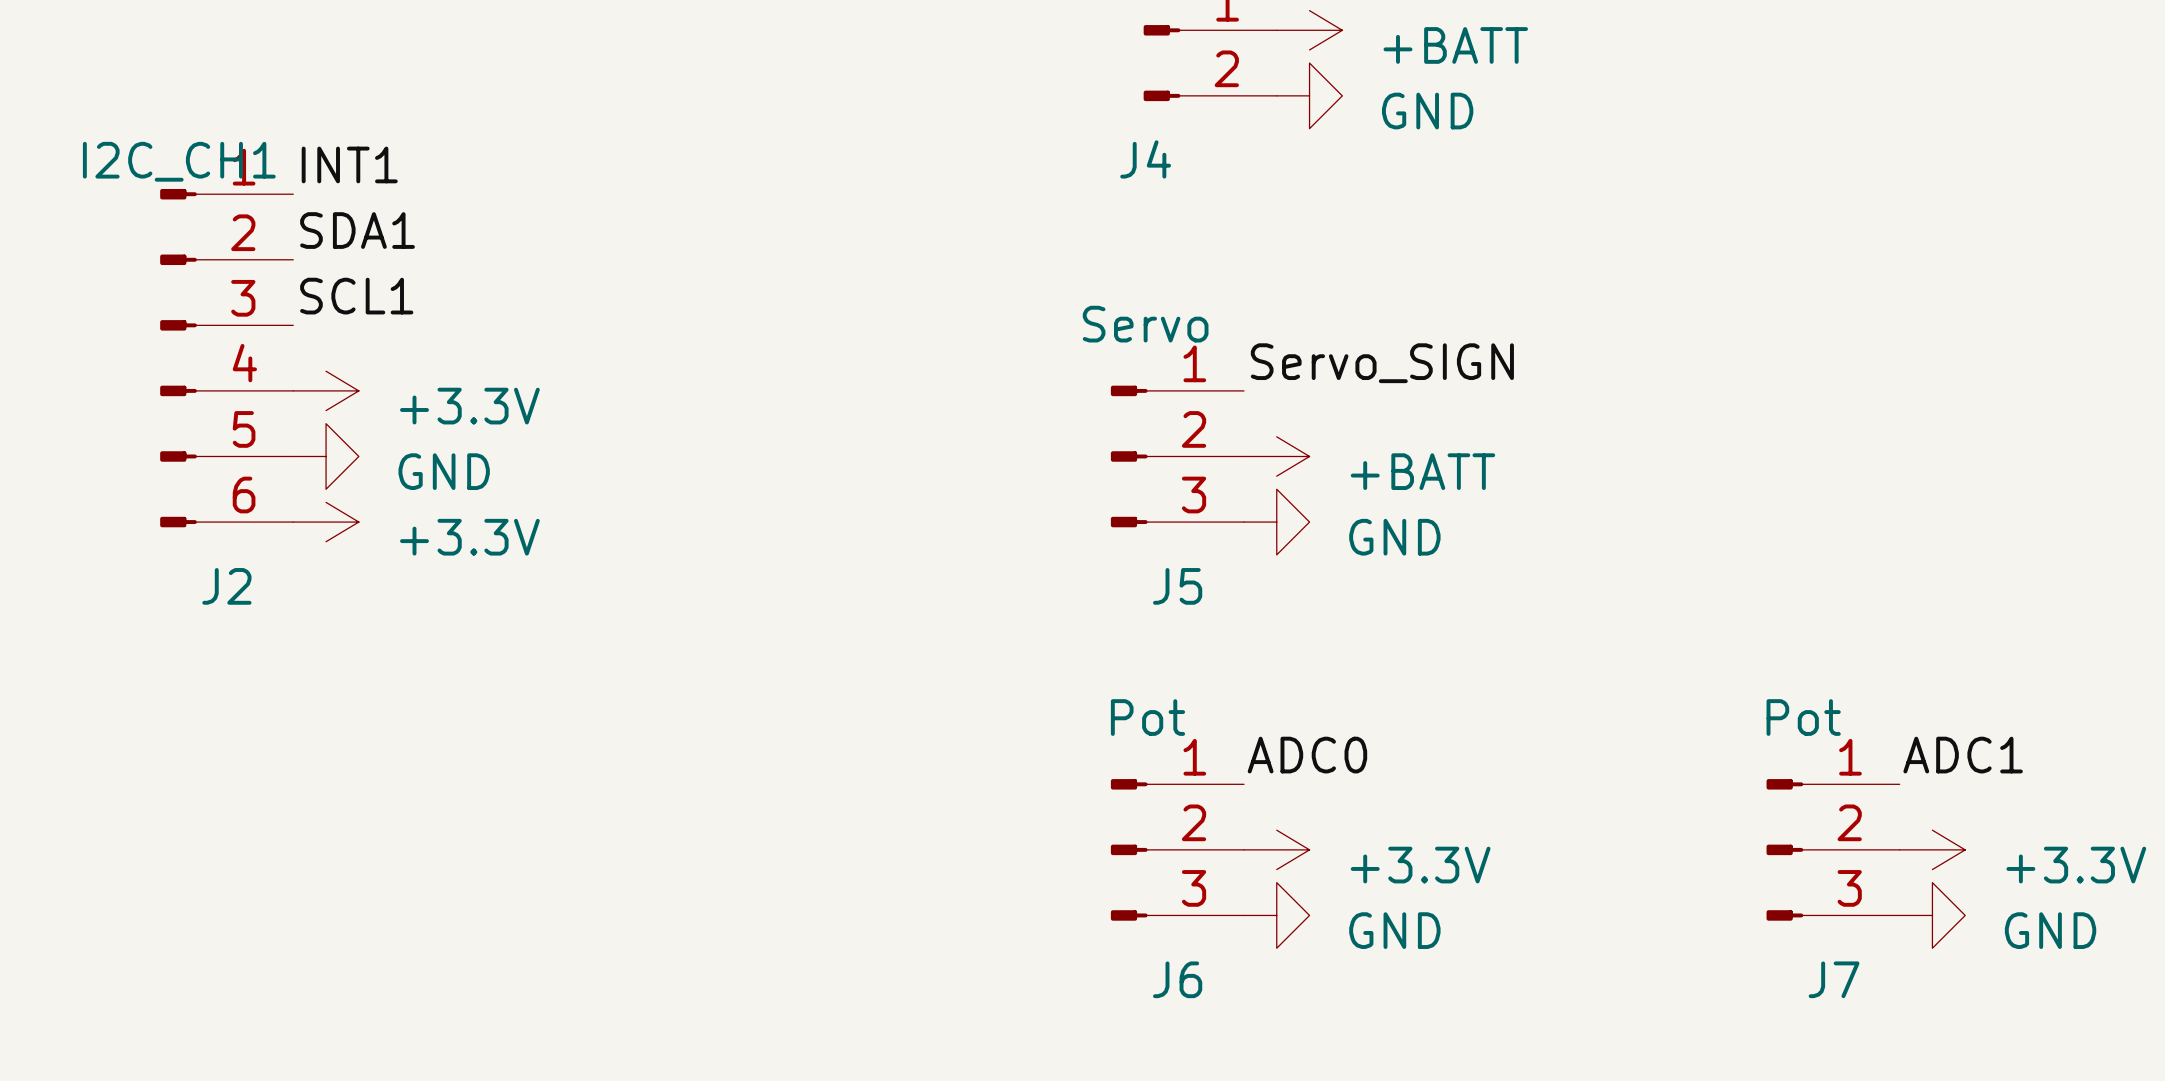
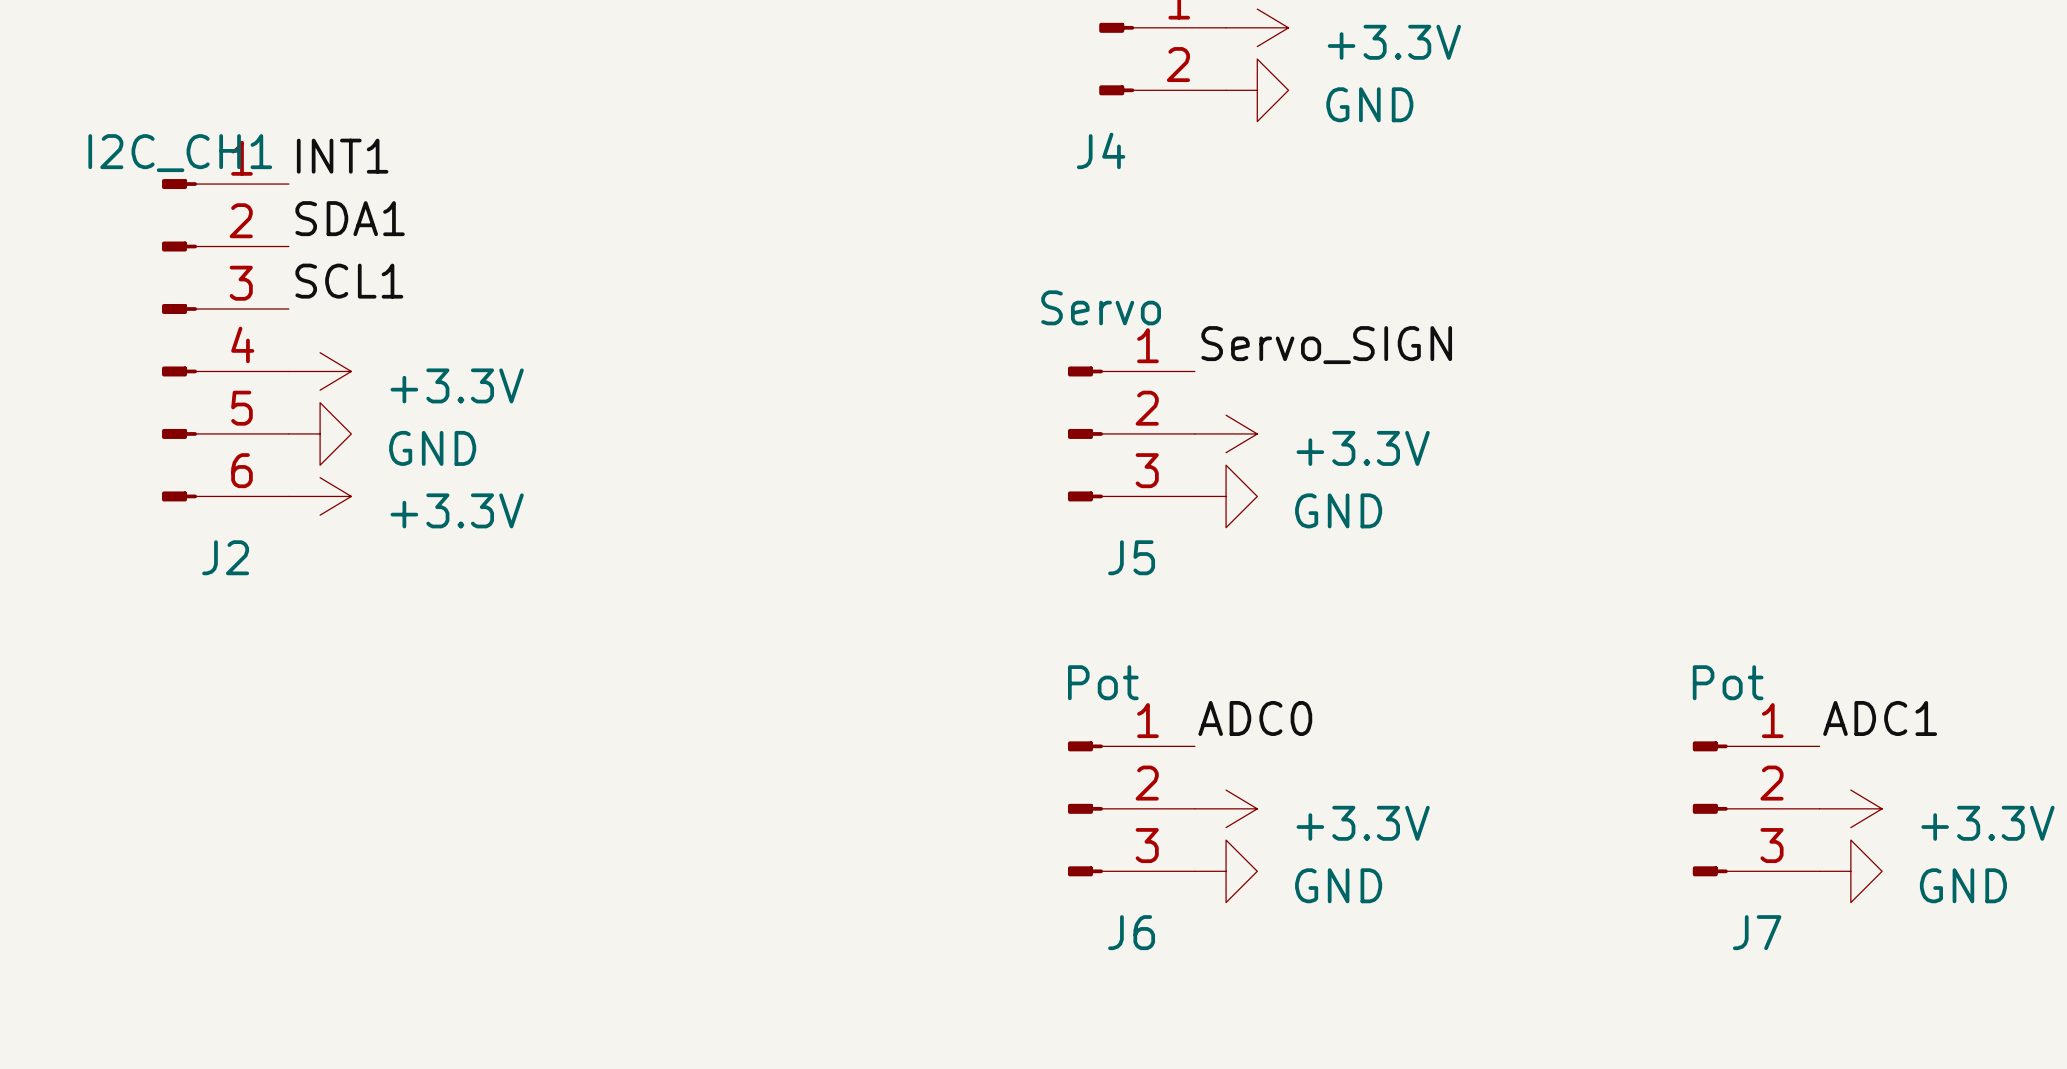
power symbol: +BATT (1309, 30) -> +3.3V (1257, 27)
power symbol: +BATT (1276, 456) -> +3.3V (1226, 433)

